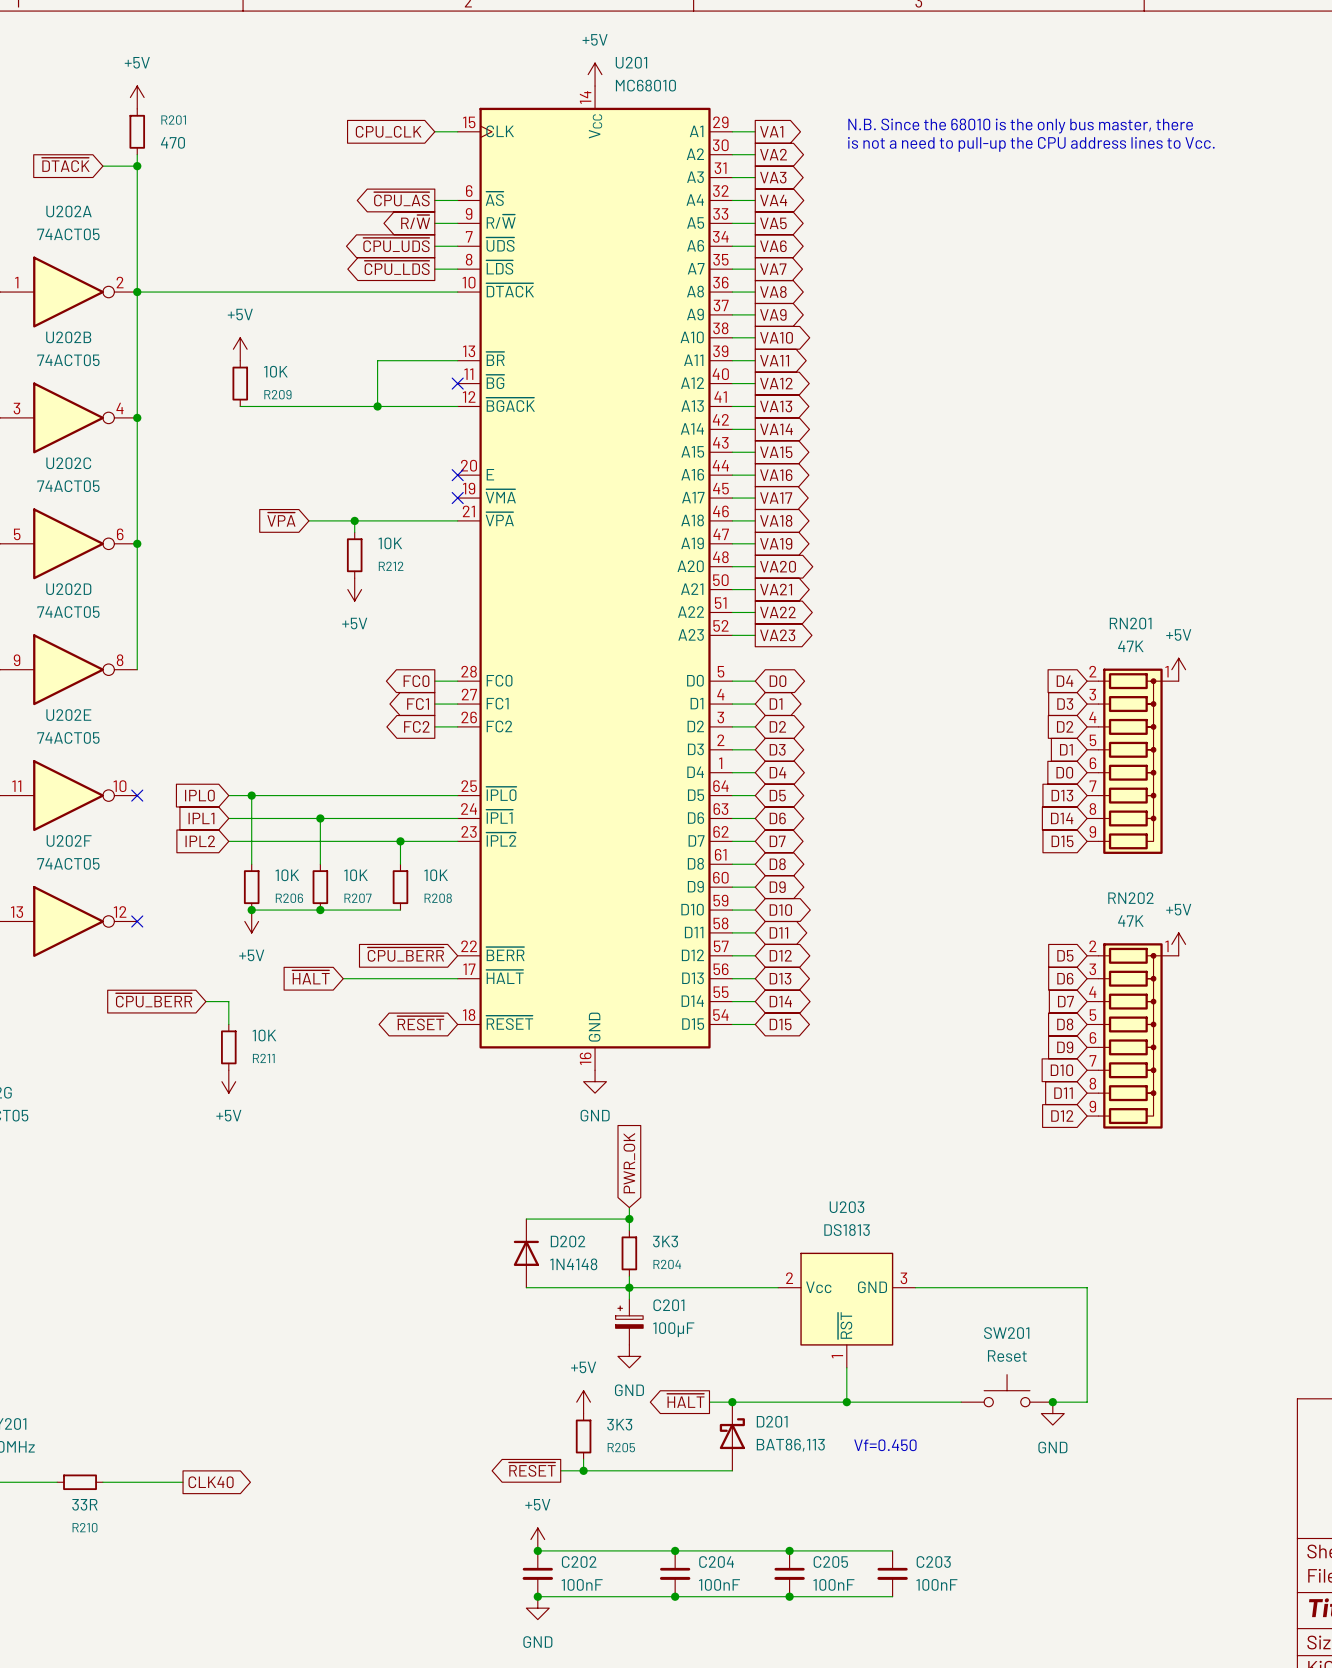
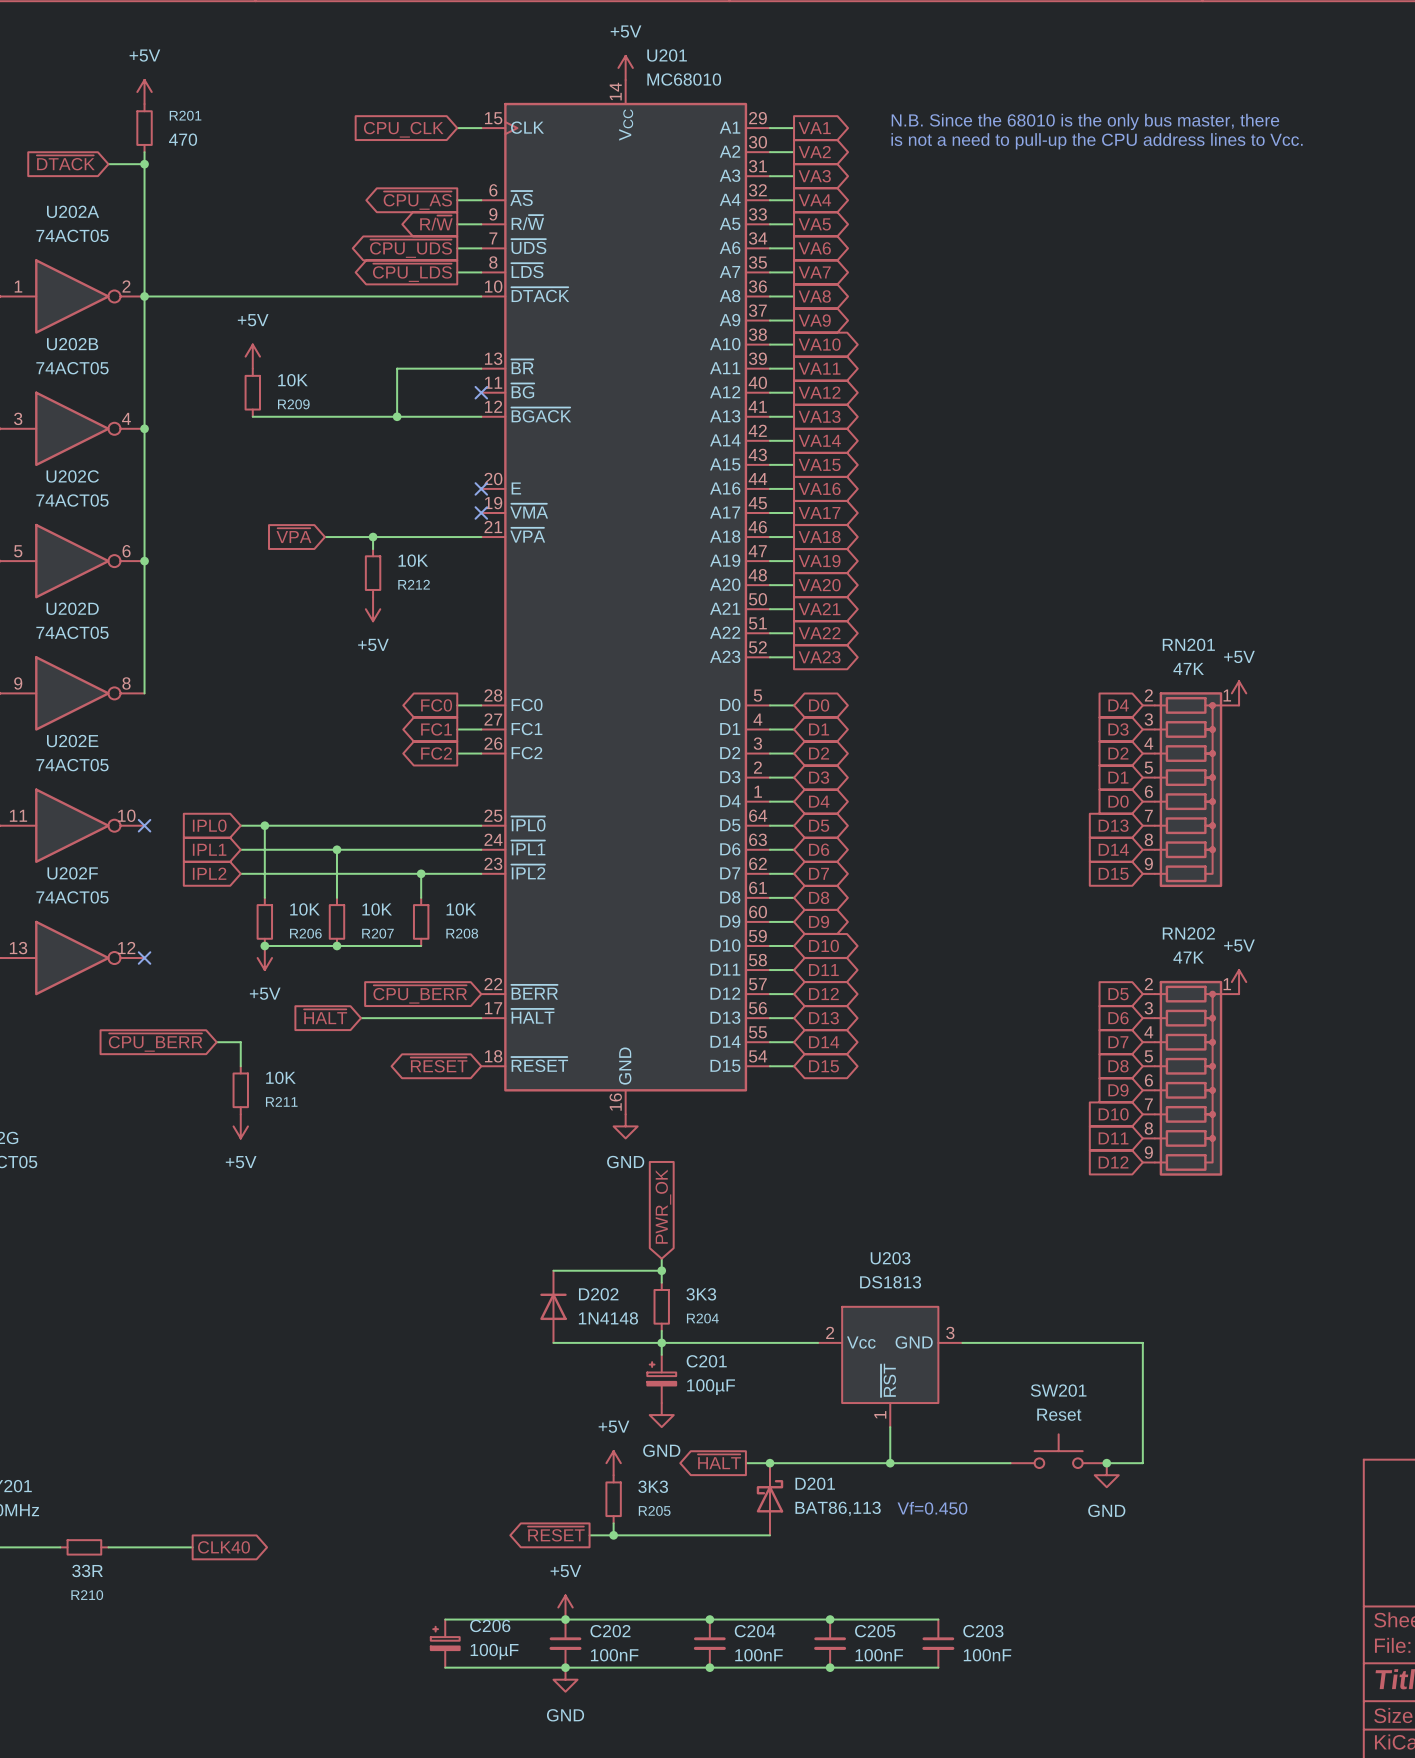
wire: none -> (445, 1619) (565, 1619)
C206: none -> 100µF (445, 1643)
wire: none -> (445, 1667) (565, 1667)

